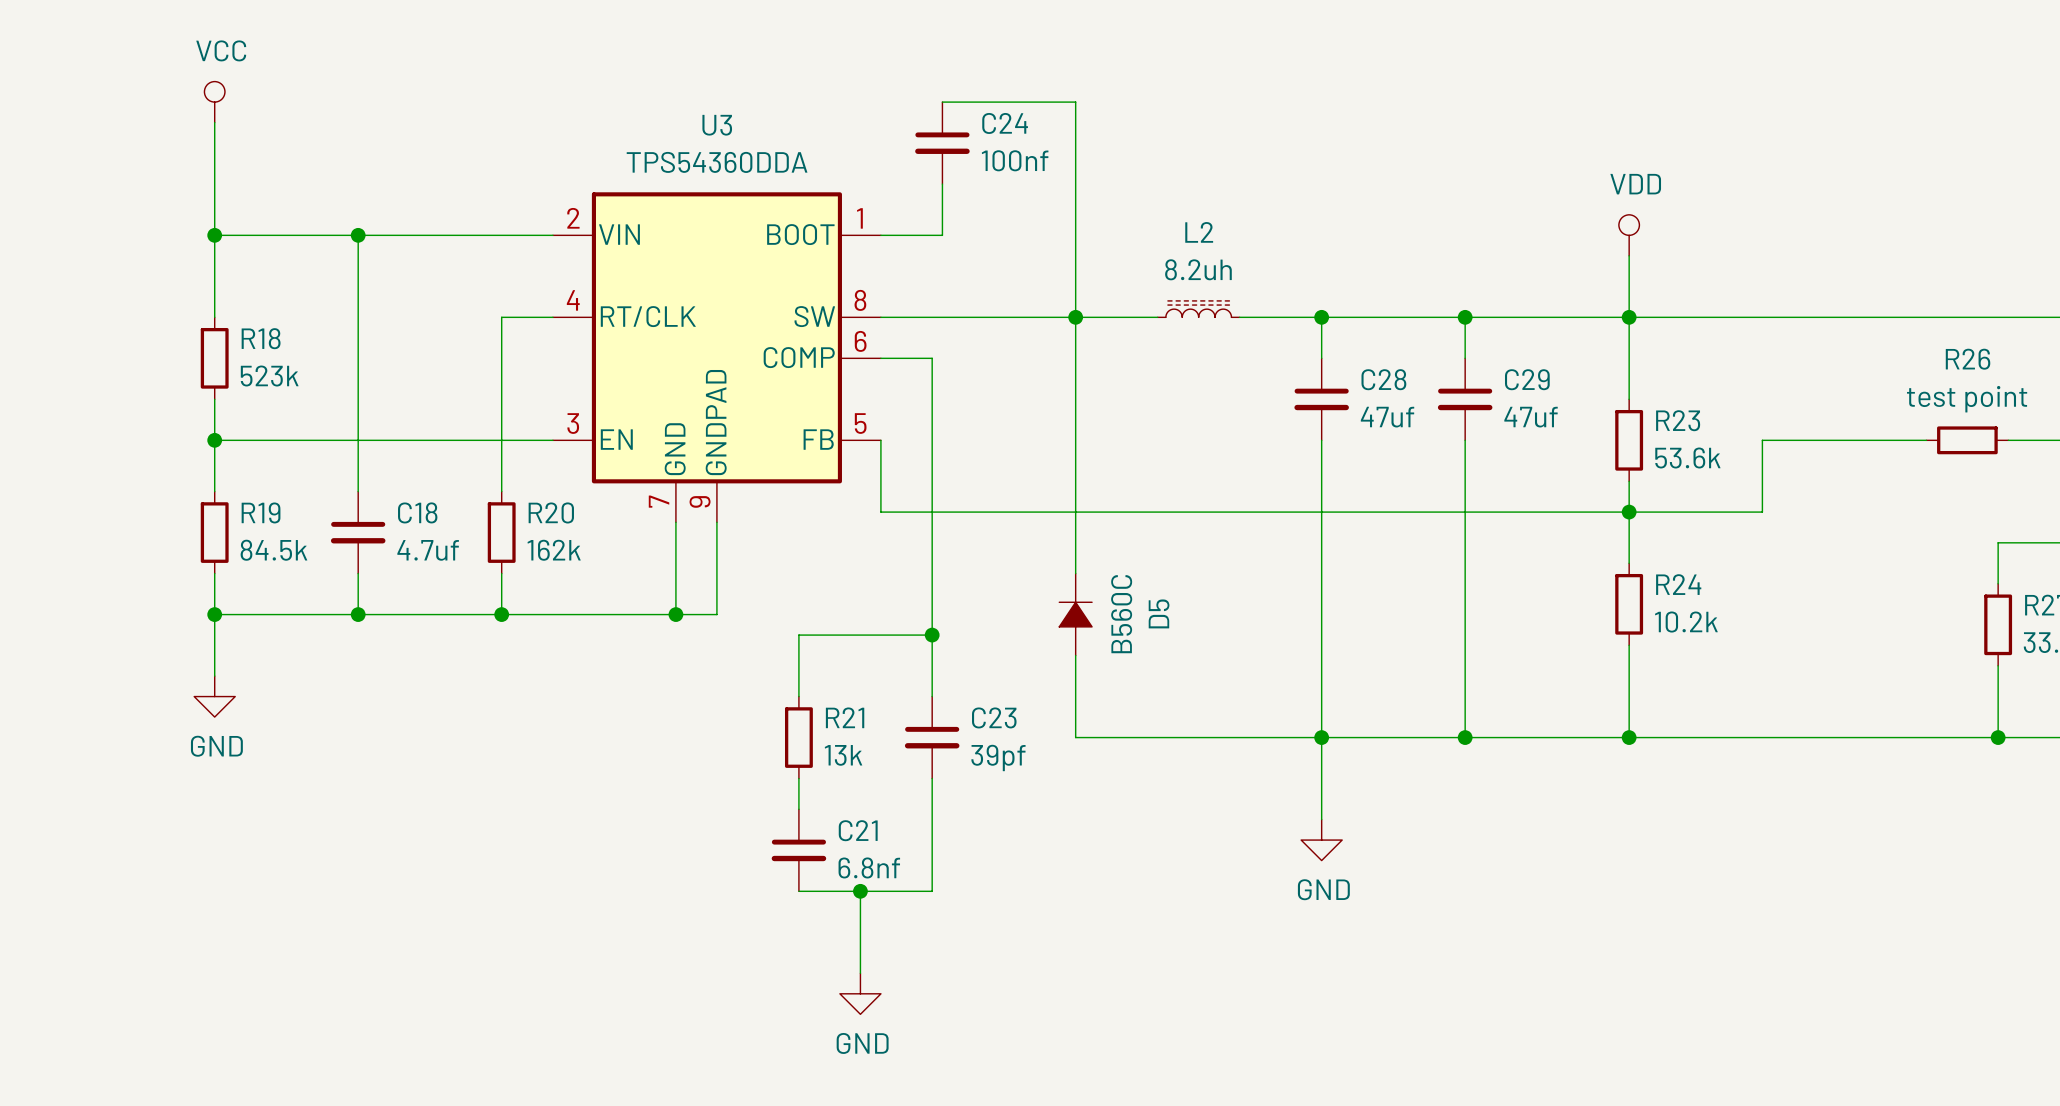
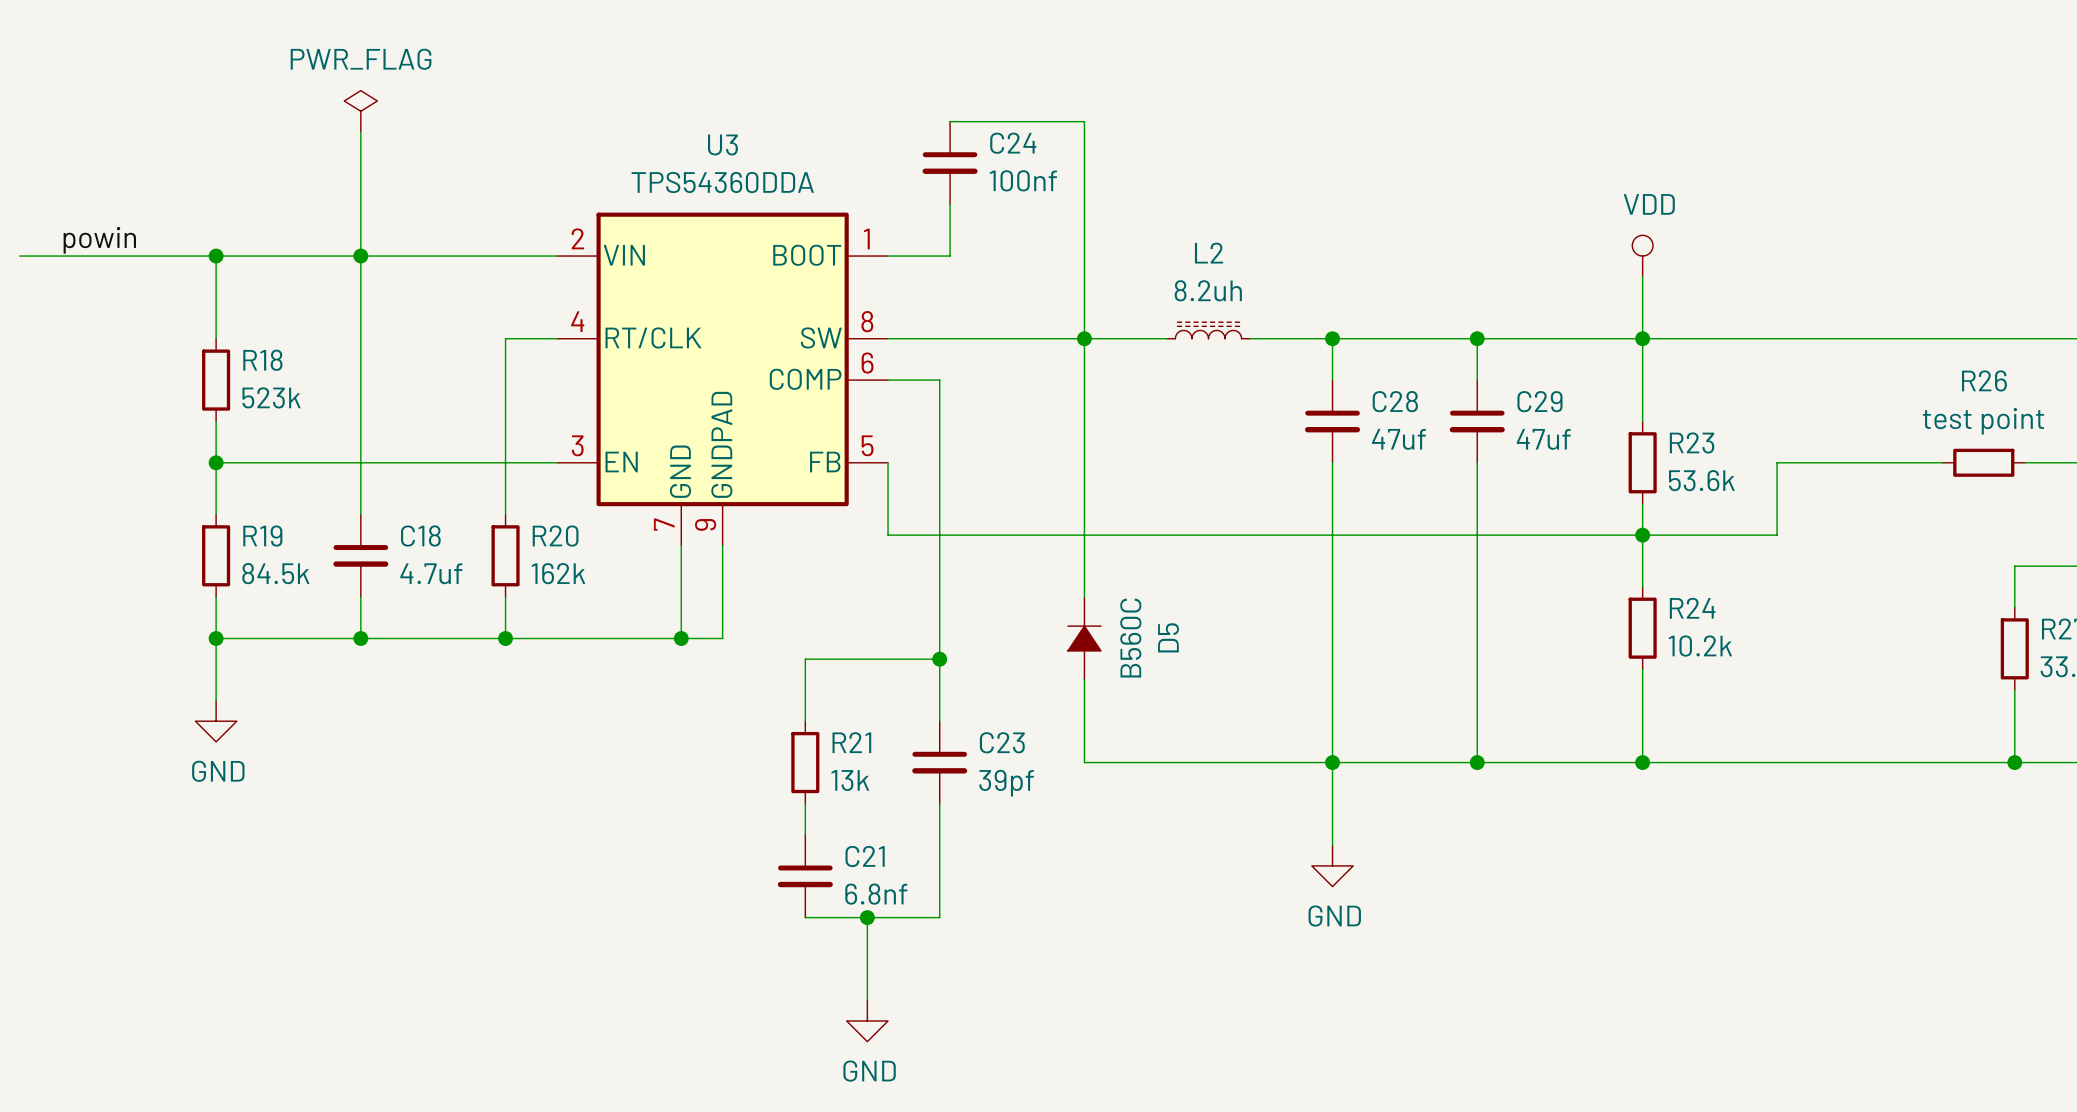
power symbol: none -> PWR_FLAG (360, 111)
power symbol: VCC (214, 102) -> none
wire: none -> (360, 131) (360, 256)
wire: (214, 122) (214, 235) -> (19, 256) (216, 256)
label: none -> powin (99, 240)

